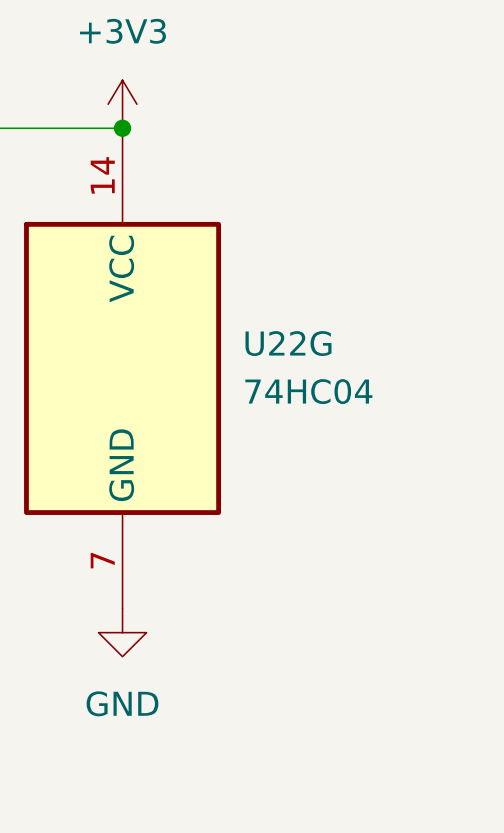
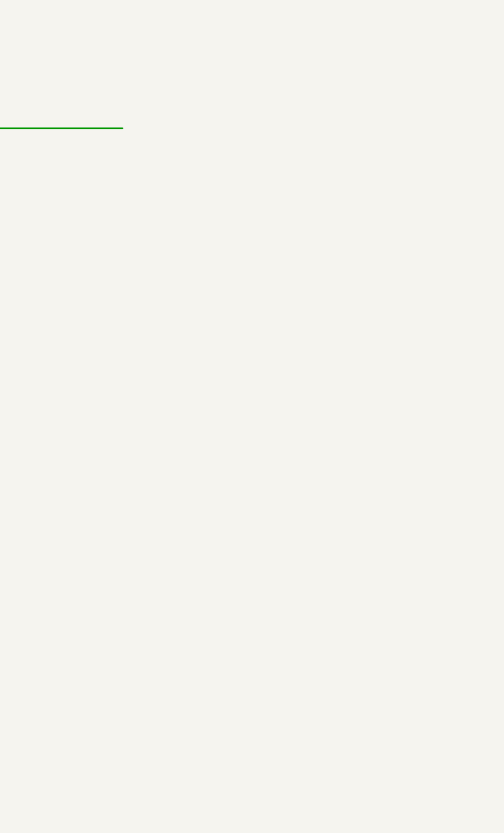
power symbol: +3V3 (122, 104) -> none
junction: (122, 128) -> none
U22G: 74HC04 (122, 368) -> none
power symbol: GND (122, 632) -> none

